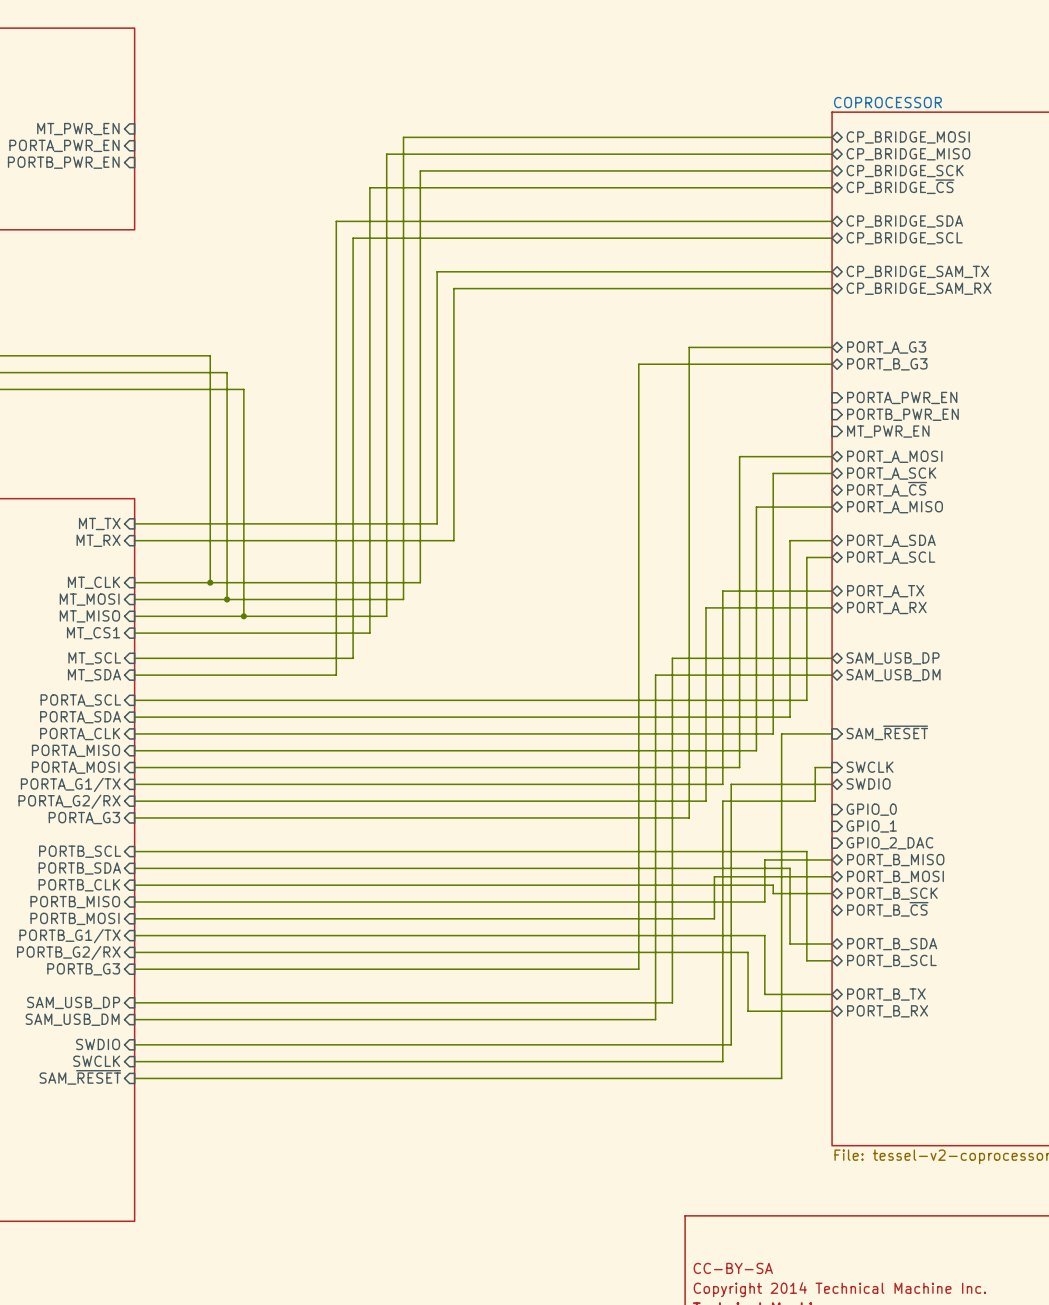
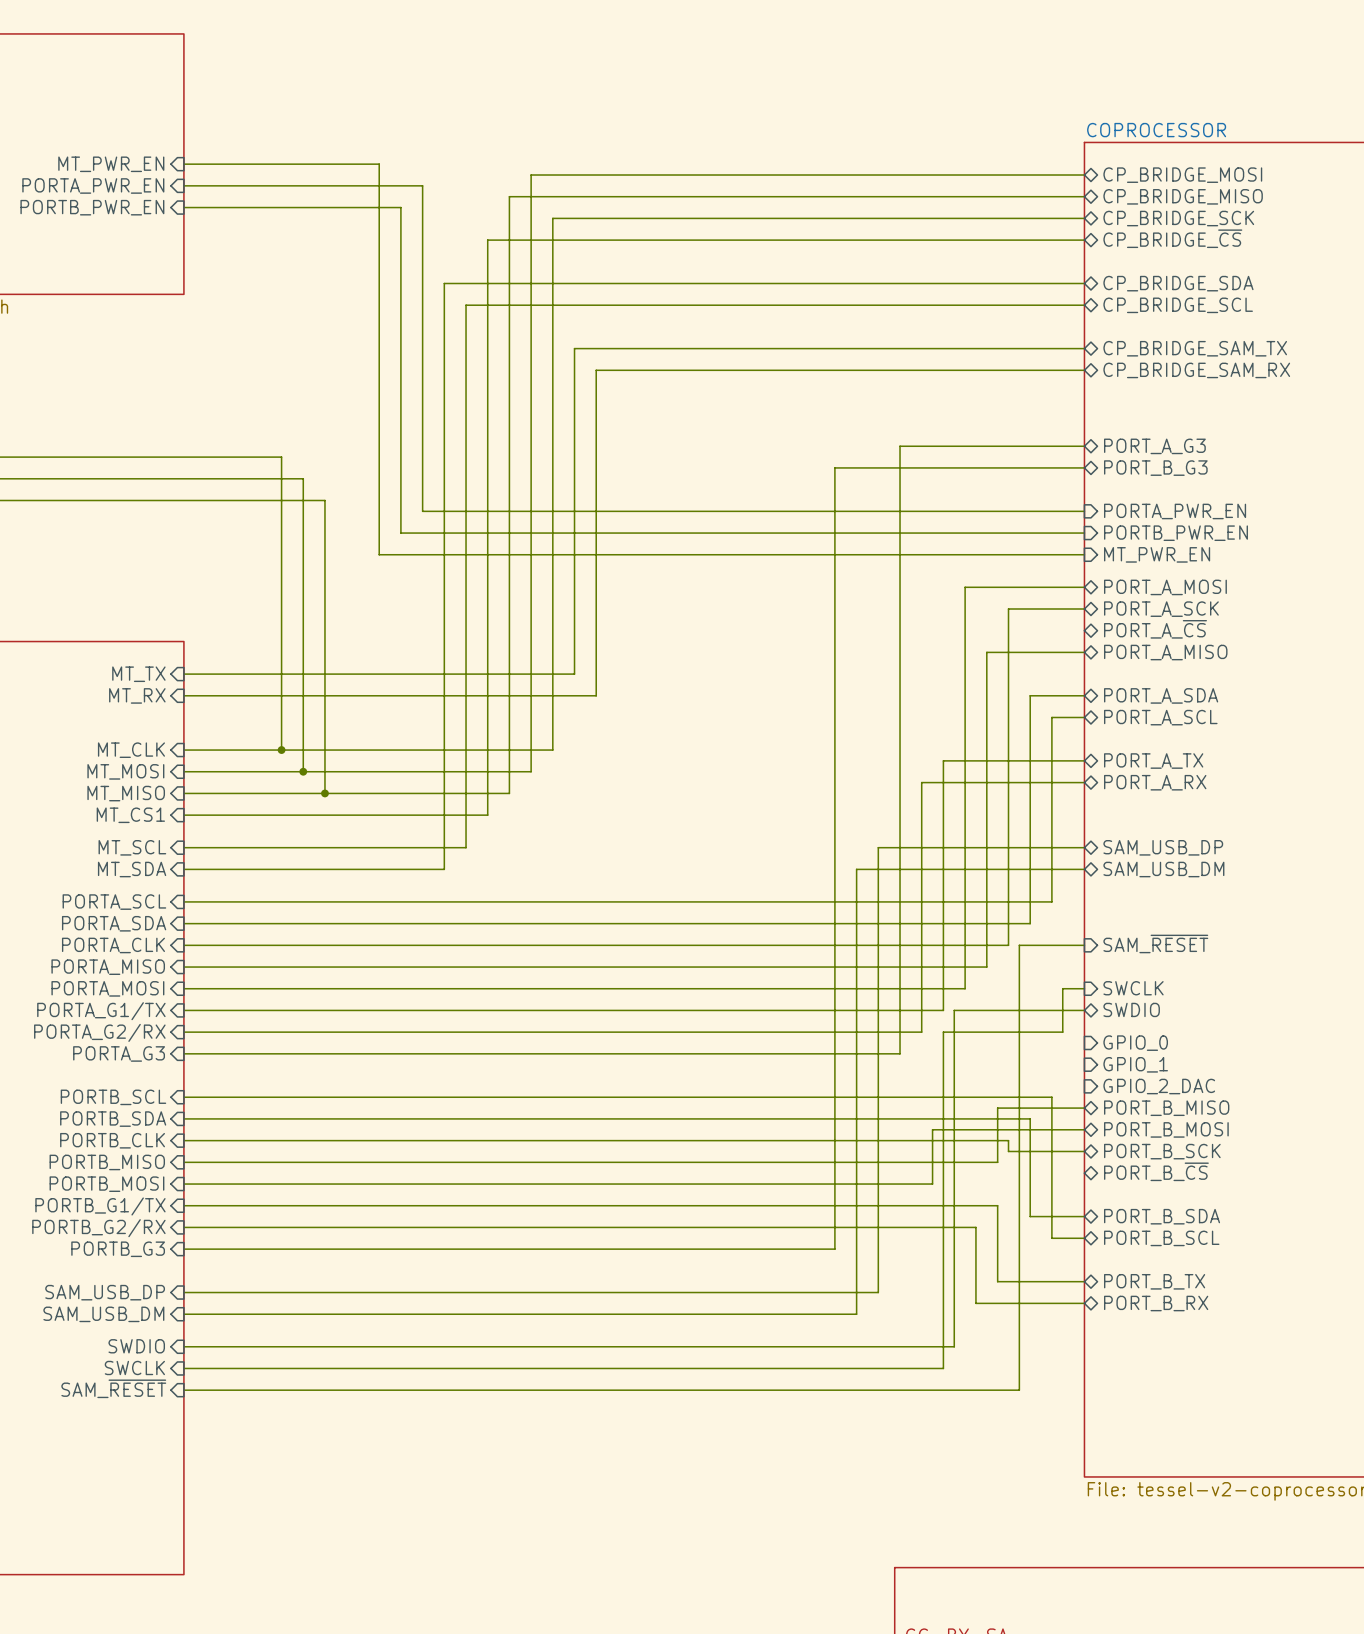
wire: none -> (183, 164) (379, 164) (379, 554) (1084, 554)
wire: none -> (183, 185) (422, 185) (422, 511) (1084, 511)
wire: none -> (183, 207) (400, 207) (400, 533) (1084, 533)

